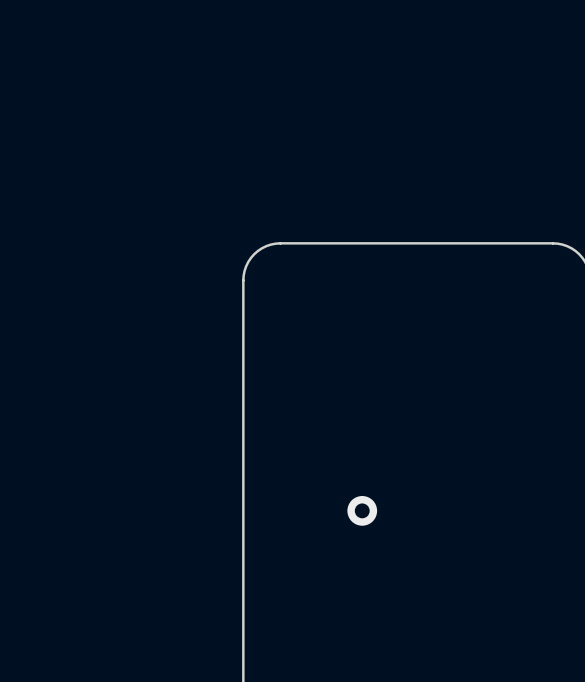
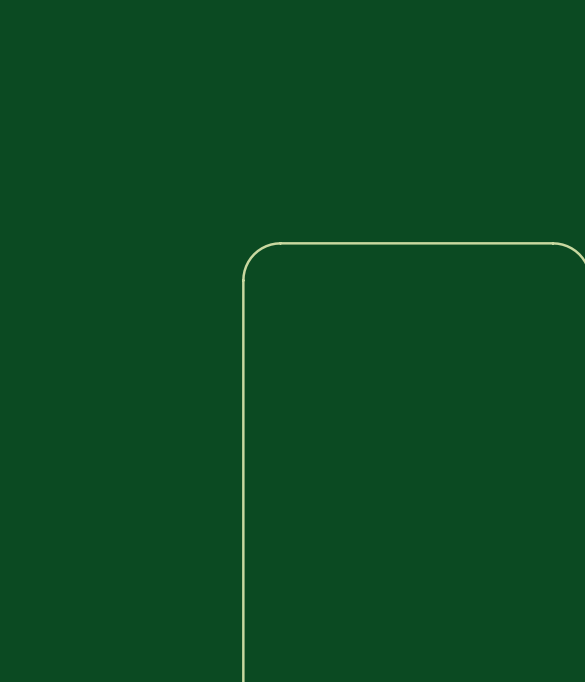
via: (362, 510) -> none

